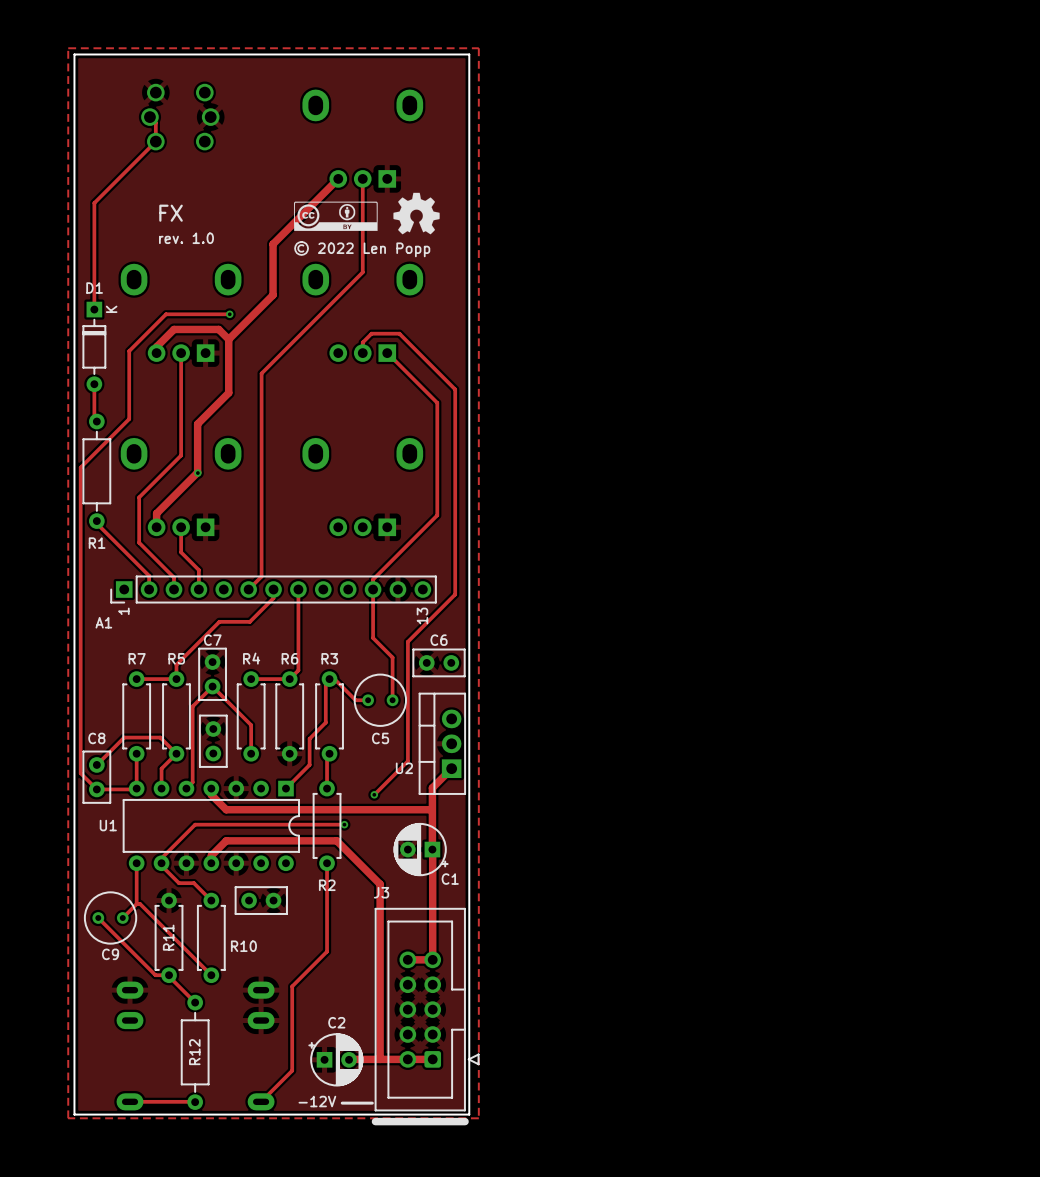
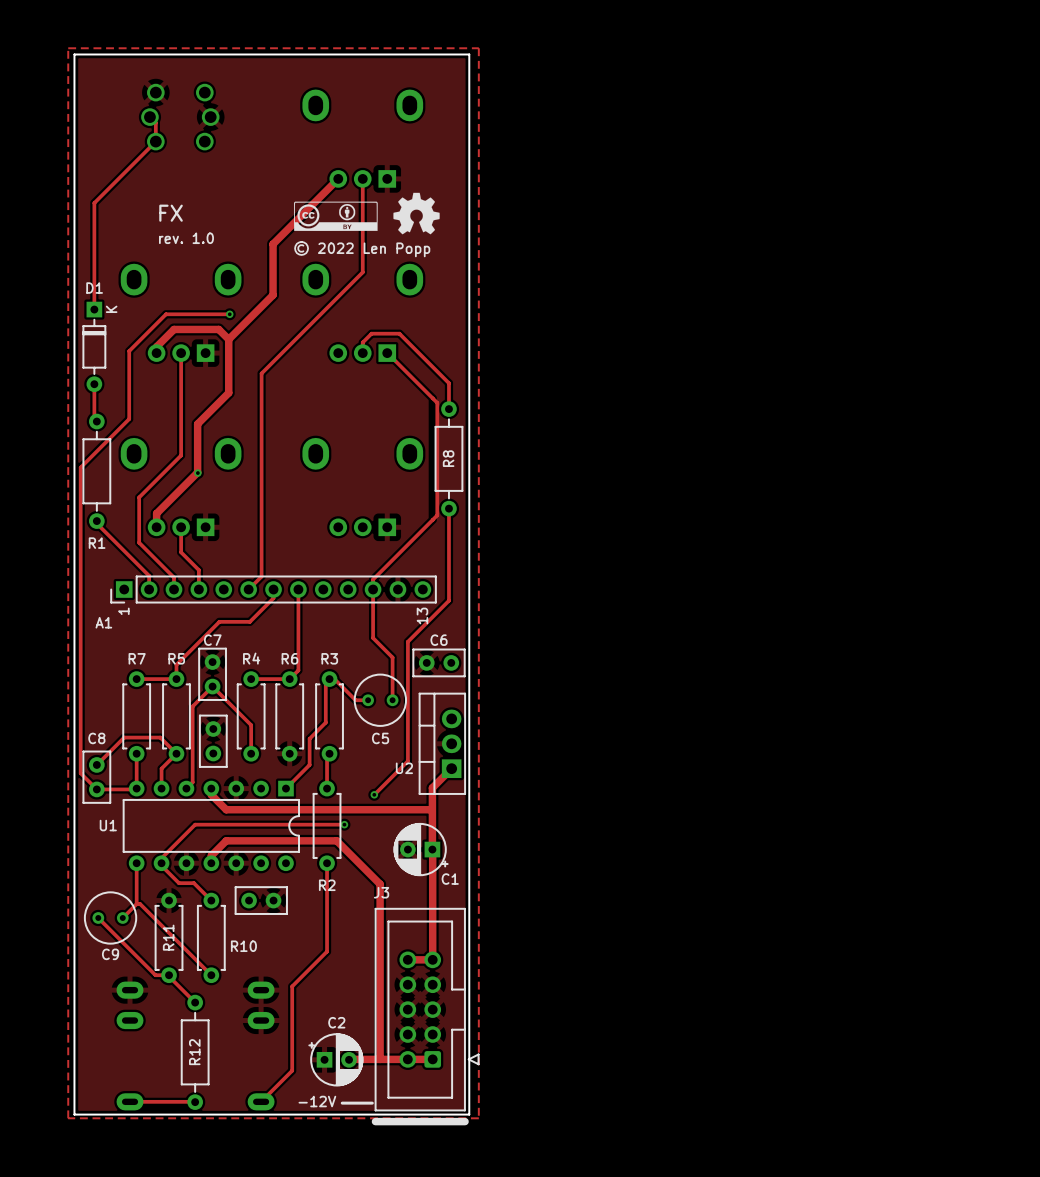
track: (448, 383) (455, 389) (455, 594) (448, 600) -> (448, 508) (448, 600)
track: none -> (448, 383) (448, 409)
R8: none -> (448, 458)

